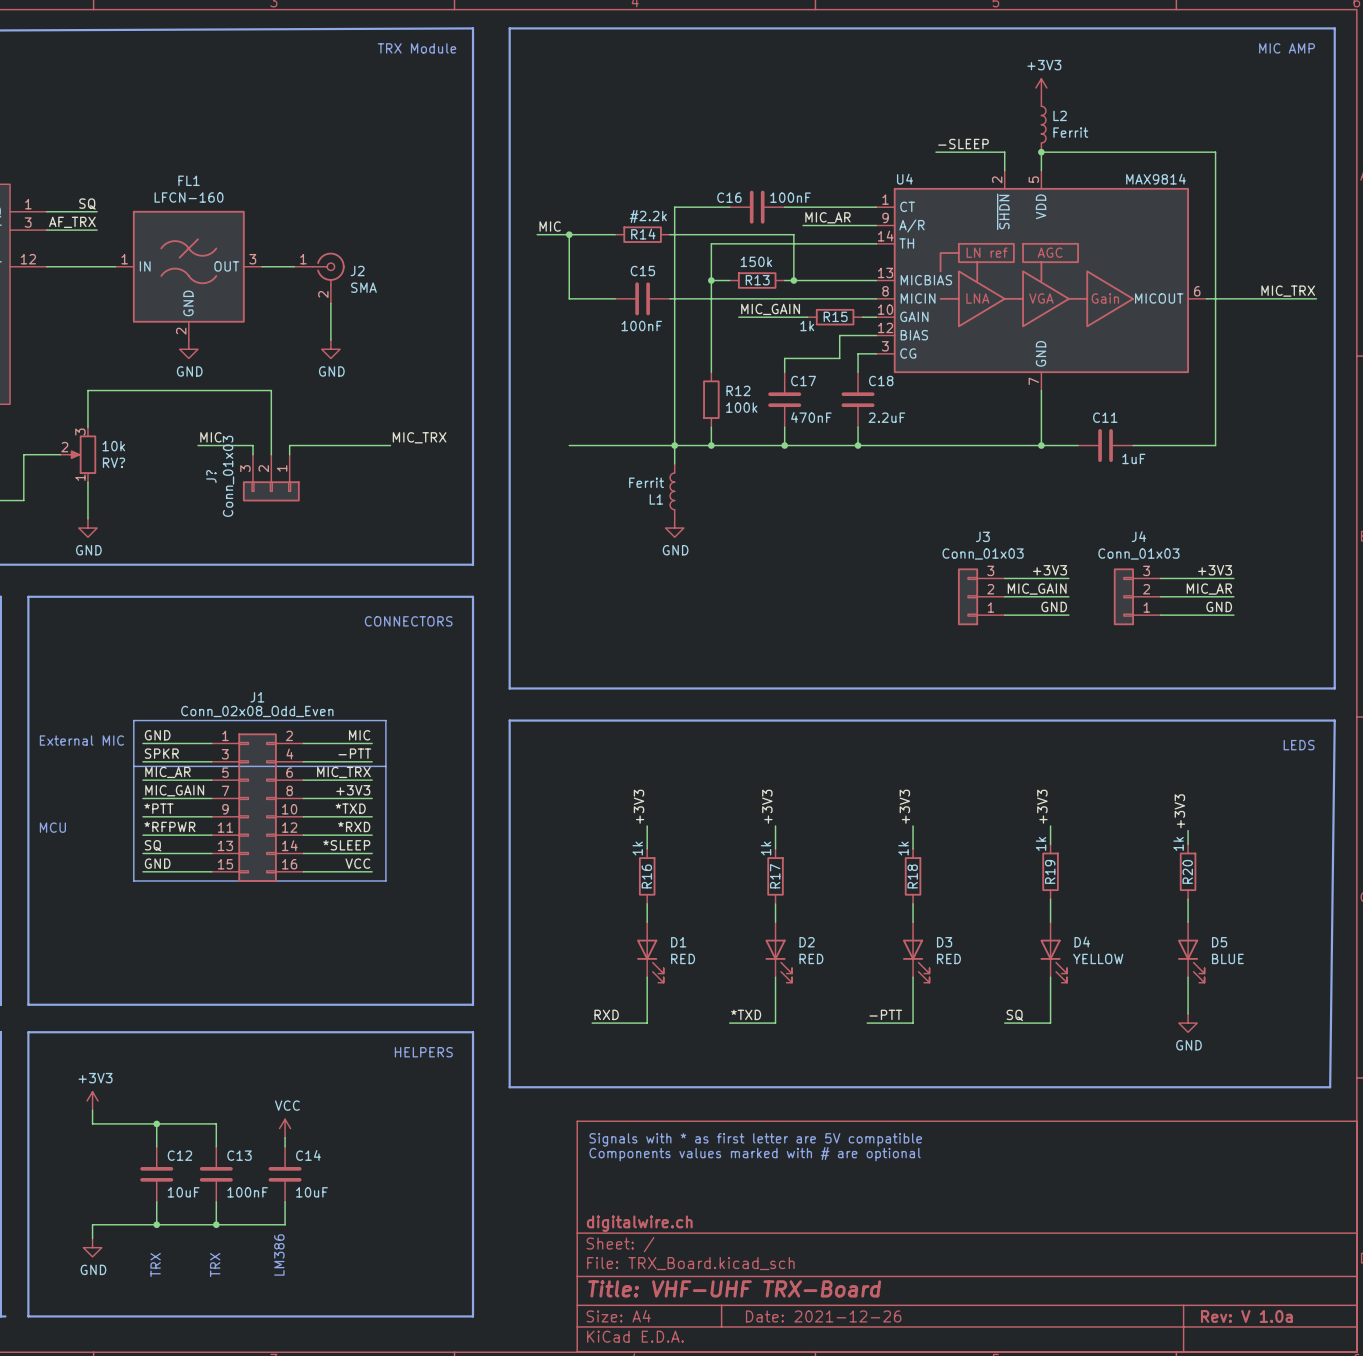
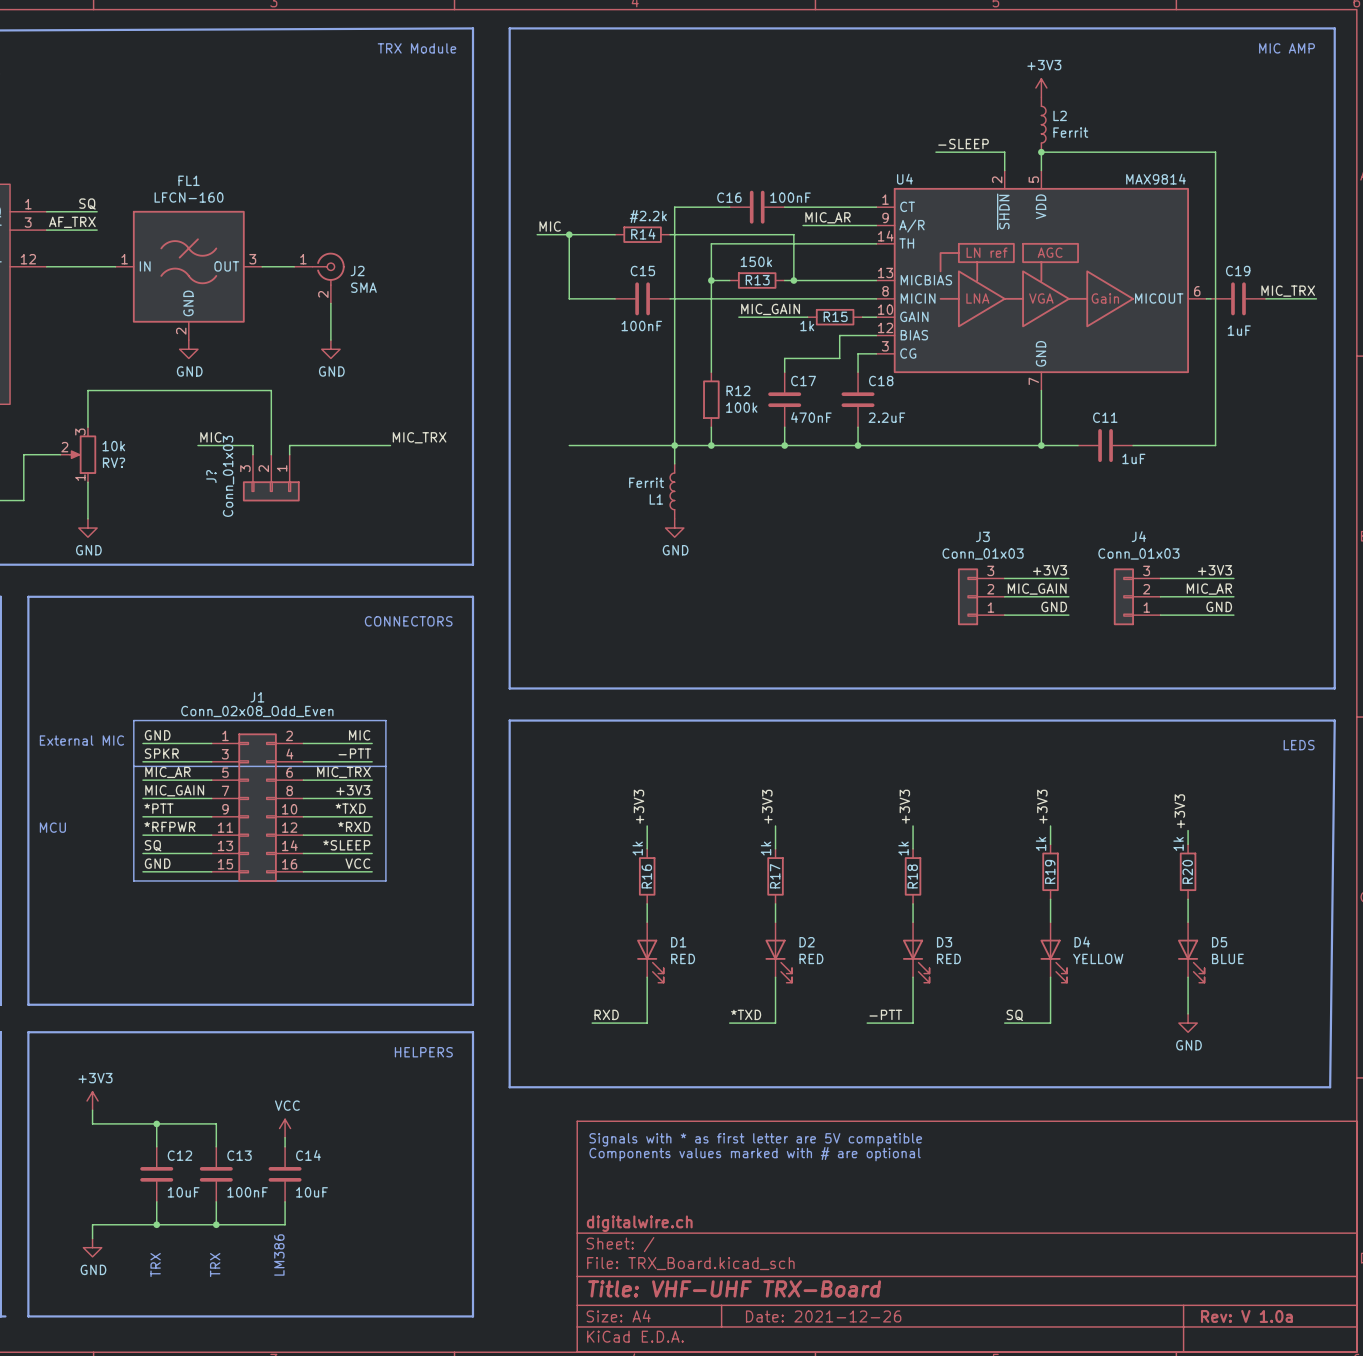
C19: none -> 1uF (1238, 298)

